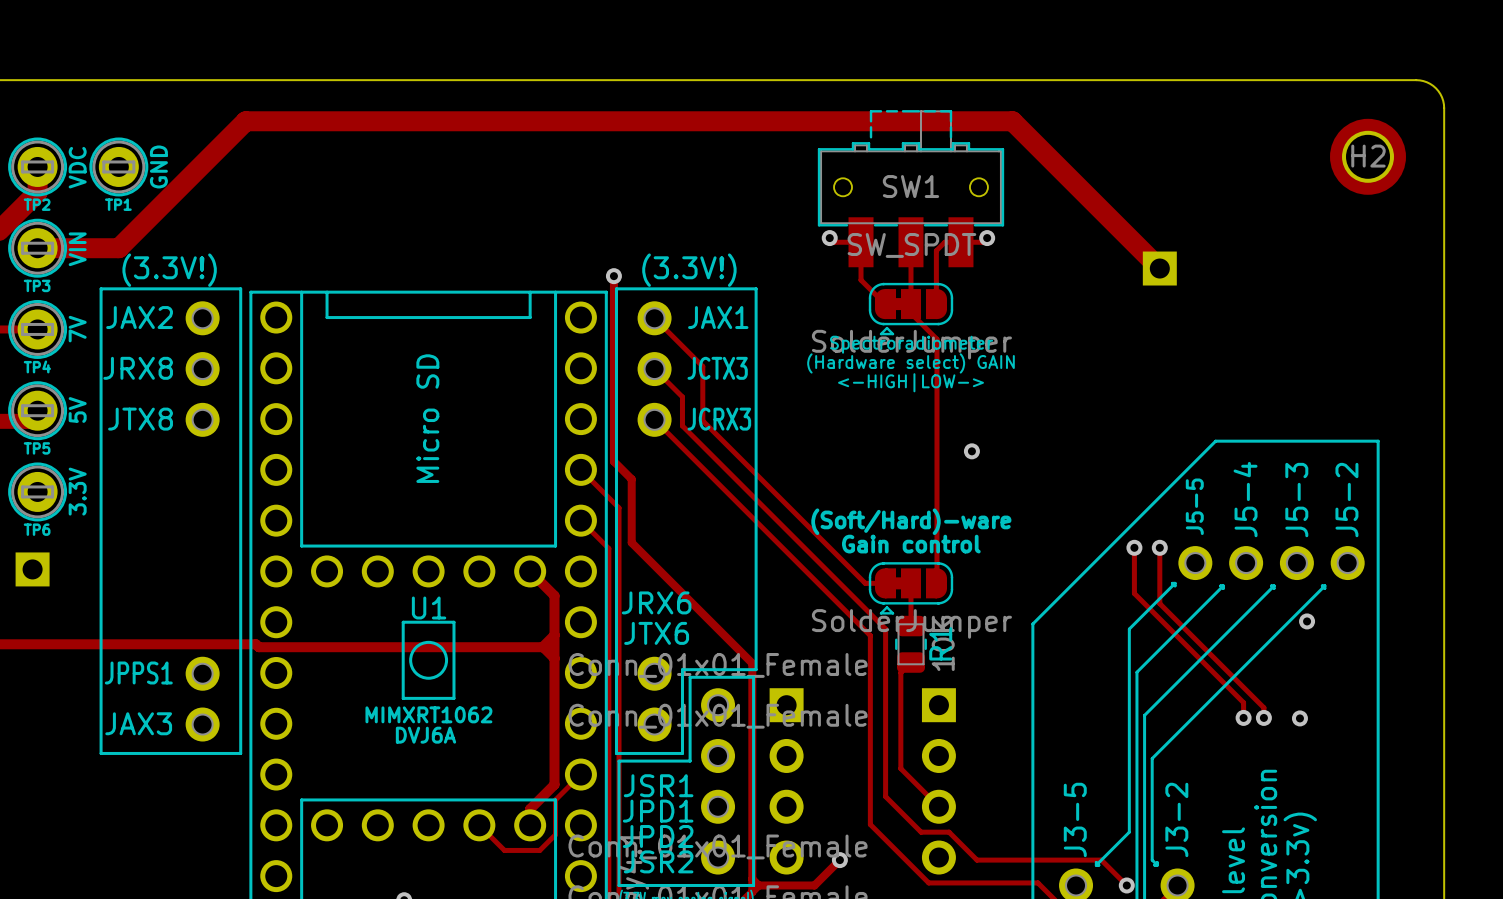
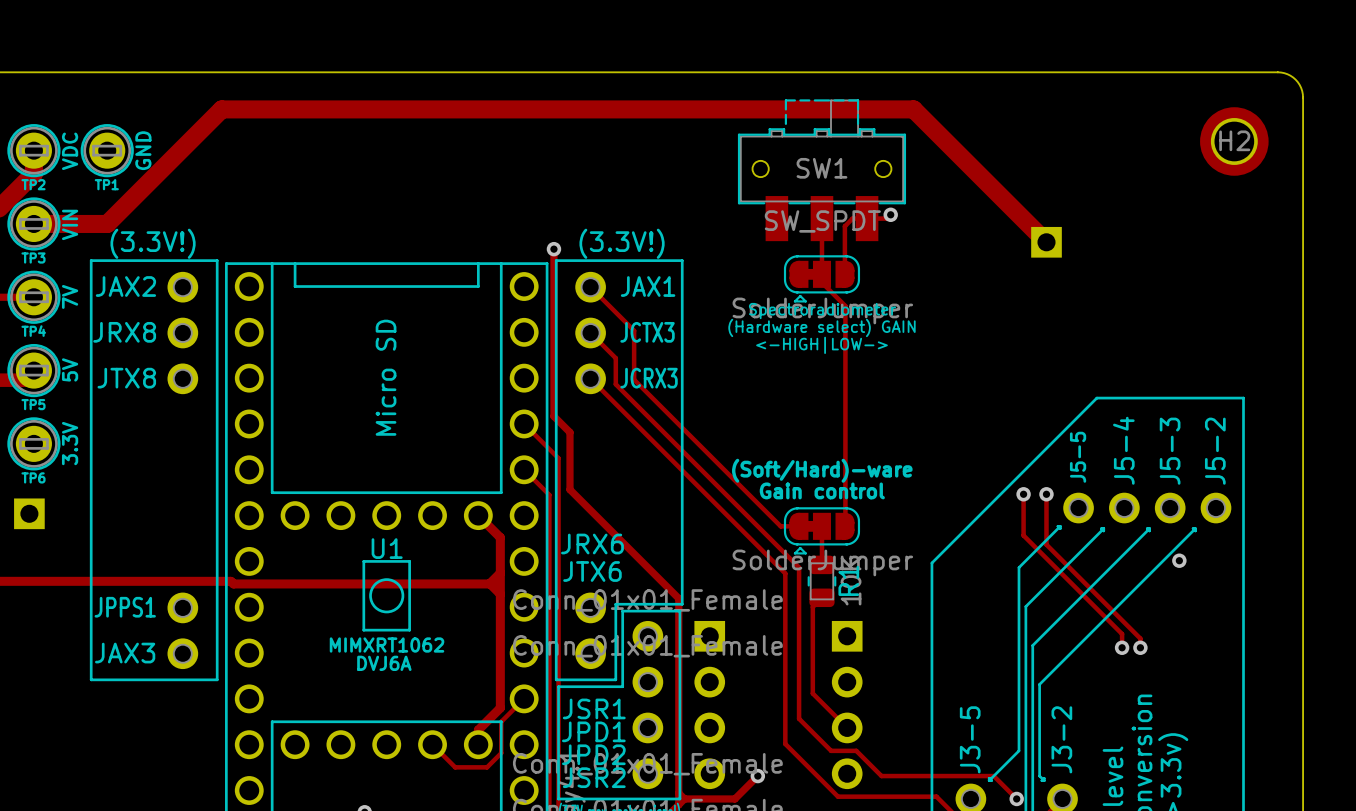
track: (829, 238) (833, 242) (861, 242) (861, 280) (885, 304) -> none
via: (829, 238) -> none
via: (971, 451) -> none
via: (1299, 718) -> none

